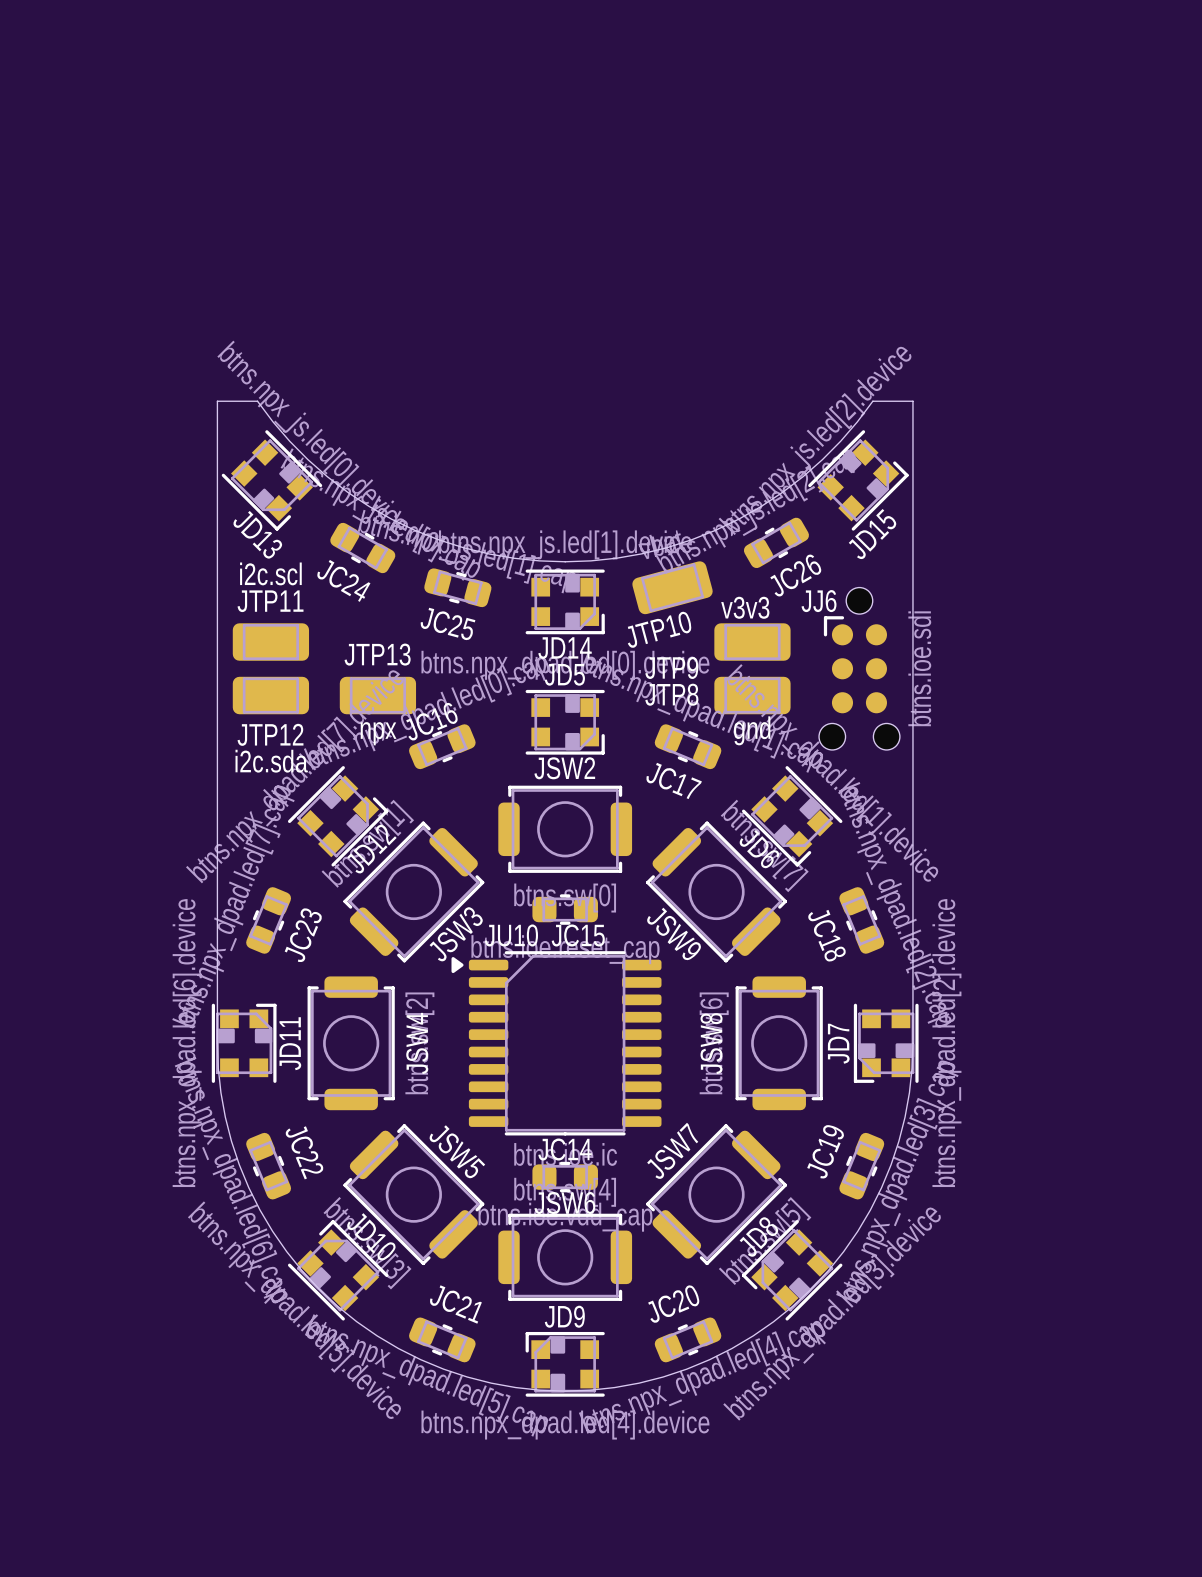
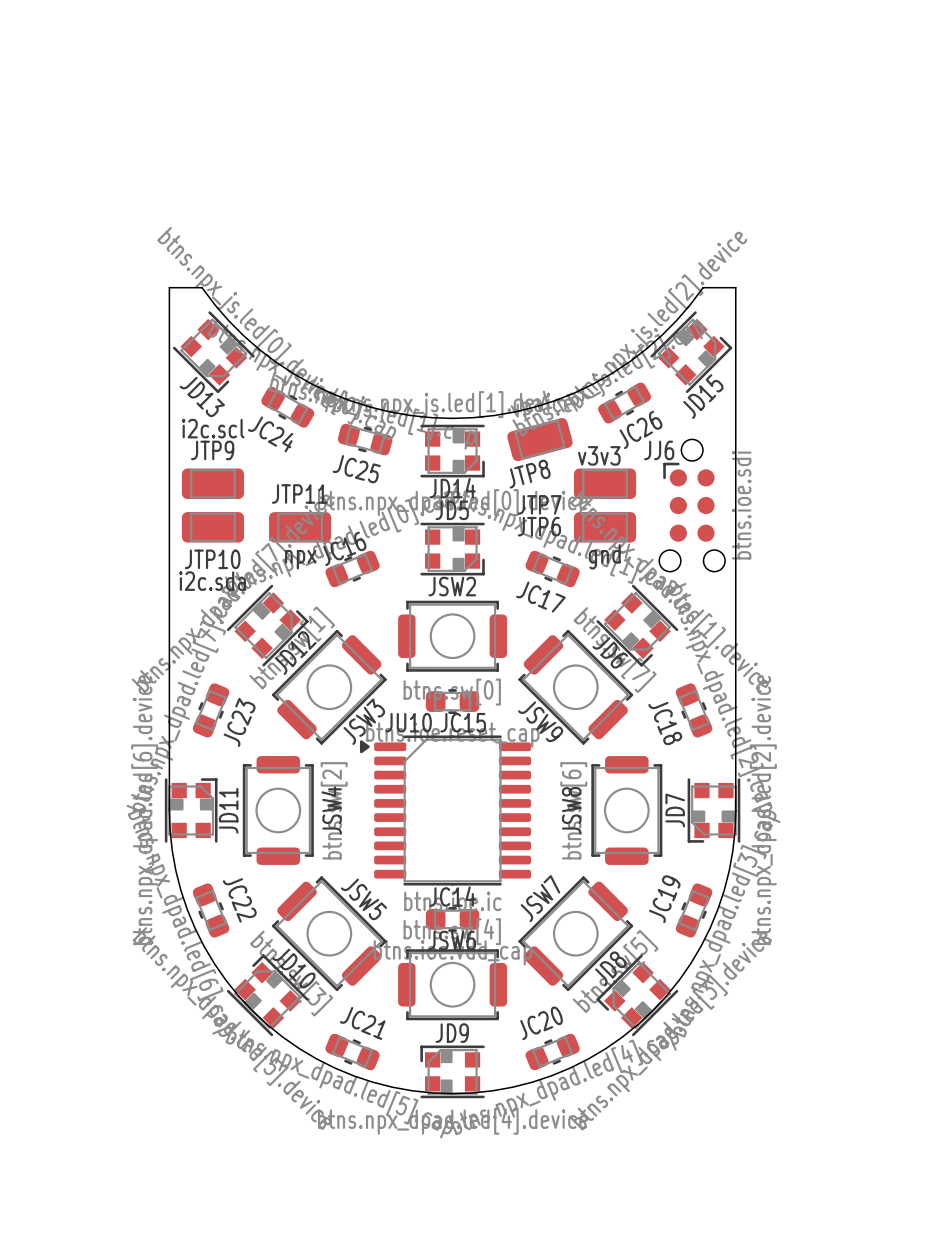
JTP11 name: JTP11 (270, 601) -> JTP9 (212, 450)
JTP10 name: JTP10 (659, 629) -> JTP8 (530, 474)
JTP13 name: JTP13 (377, 654) -> JTP11 (299, 493)
JTP9 name: JTP9 (671, 667) -> JTP7 (539, 504)
JTP8 name: JTP8 (671, 694) -> JTP6 (539, 526)
JTP12 name: JTP12 (270, 734) -> JTP10 (212, 559)

